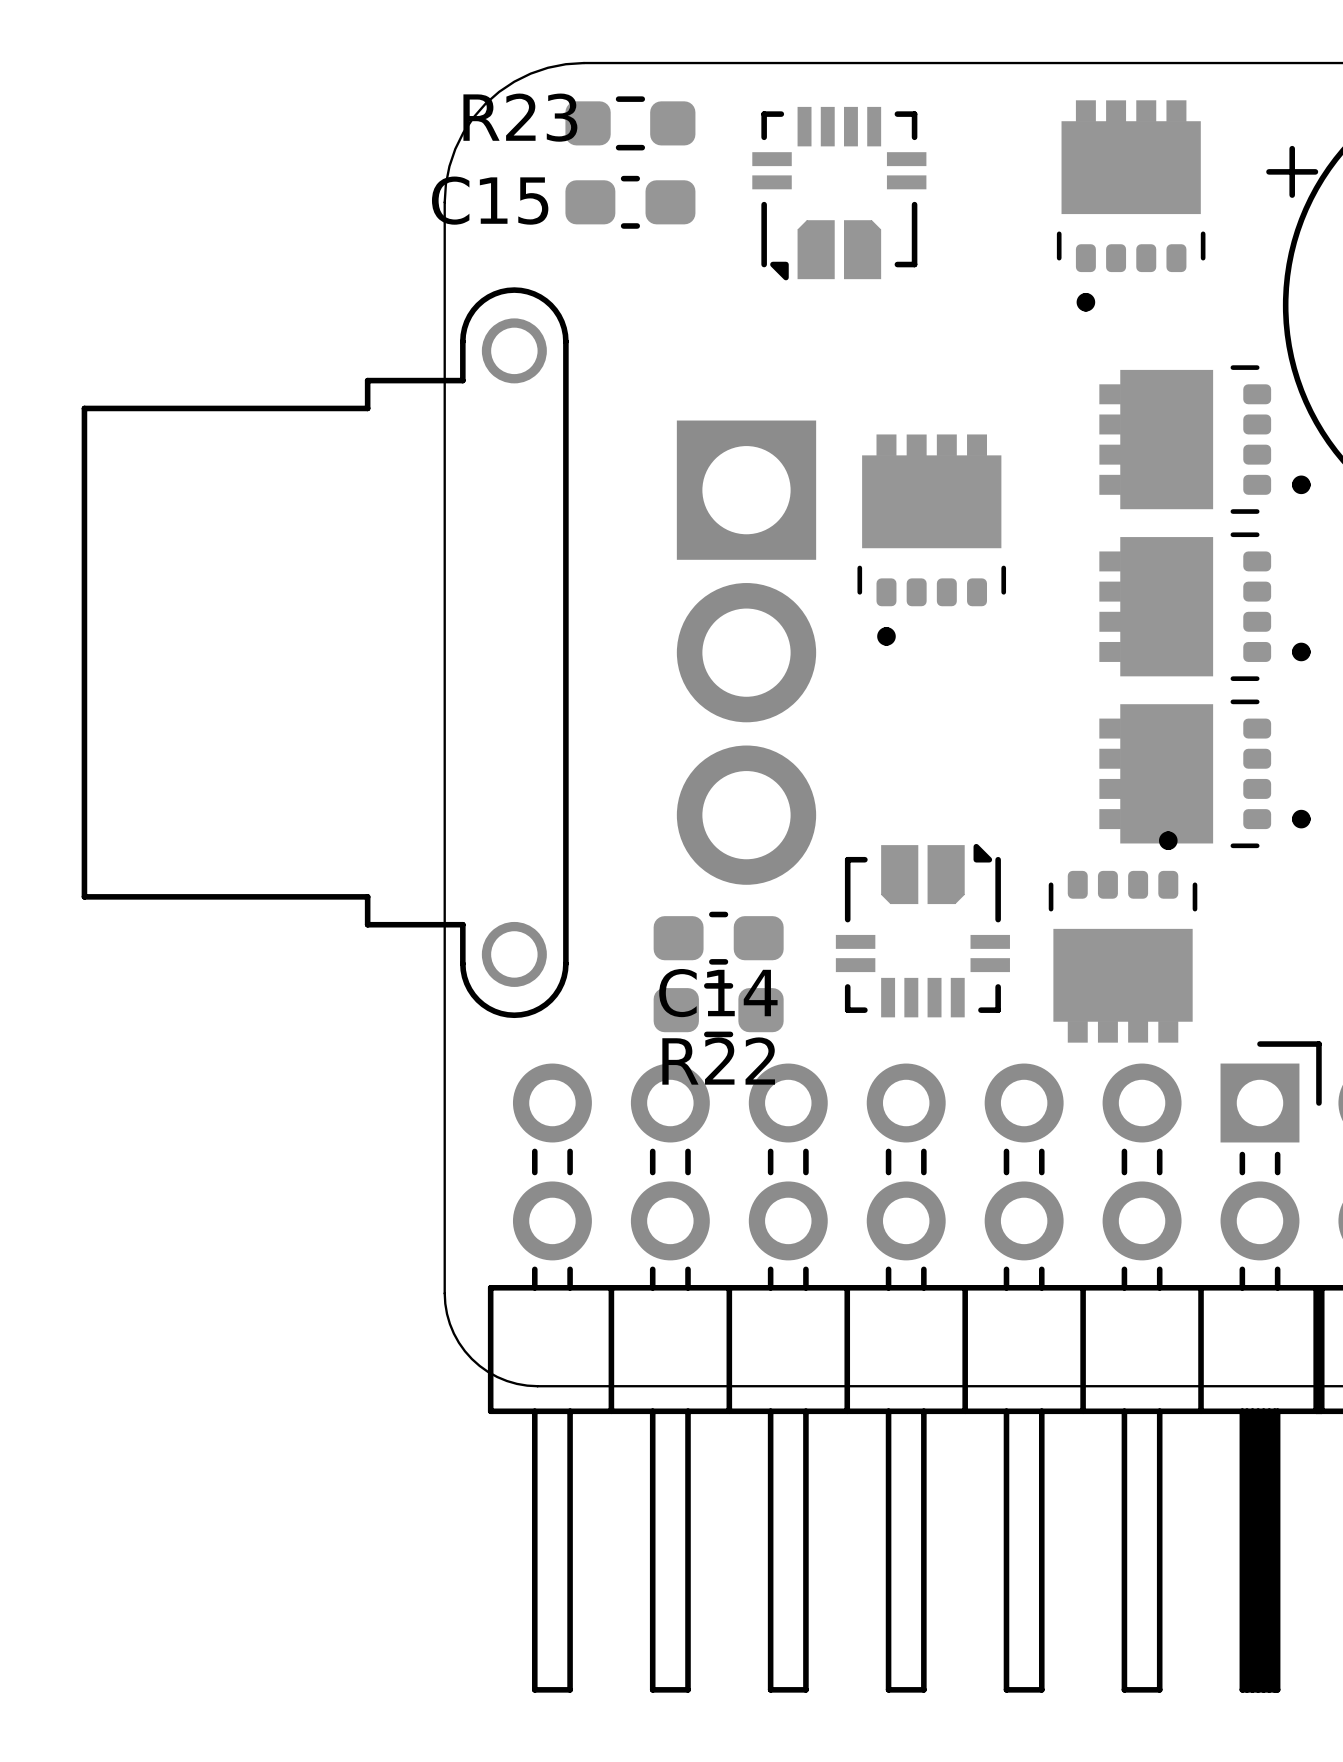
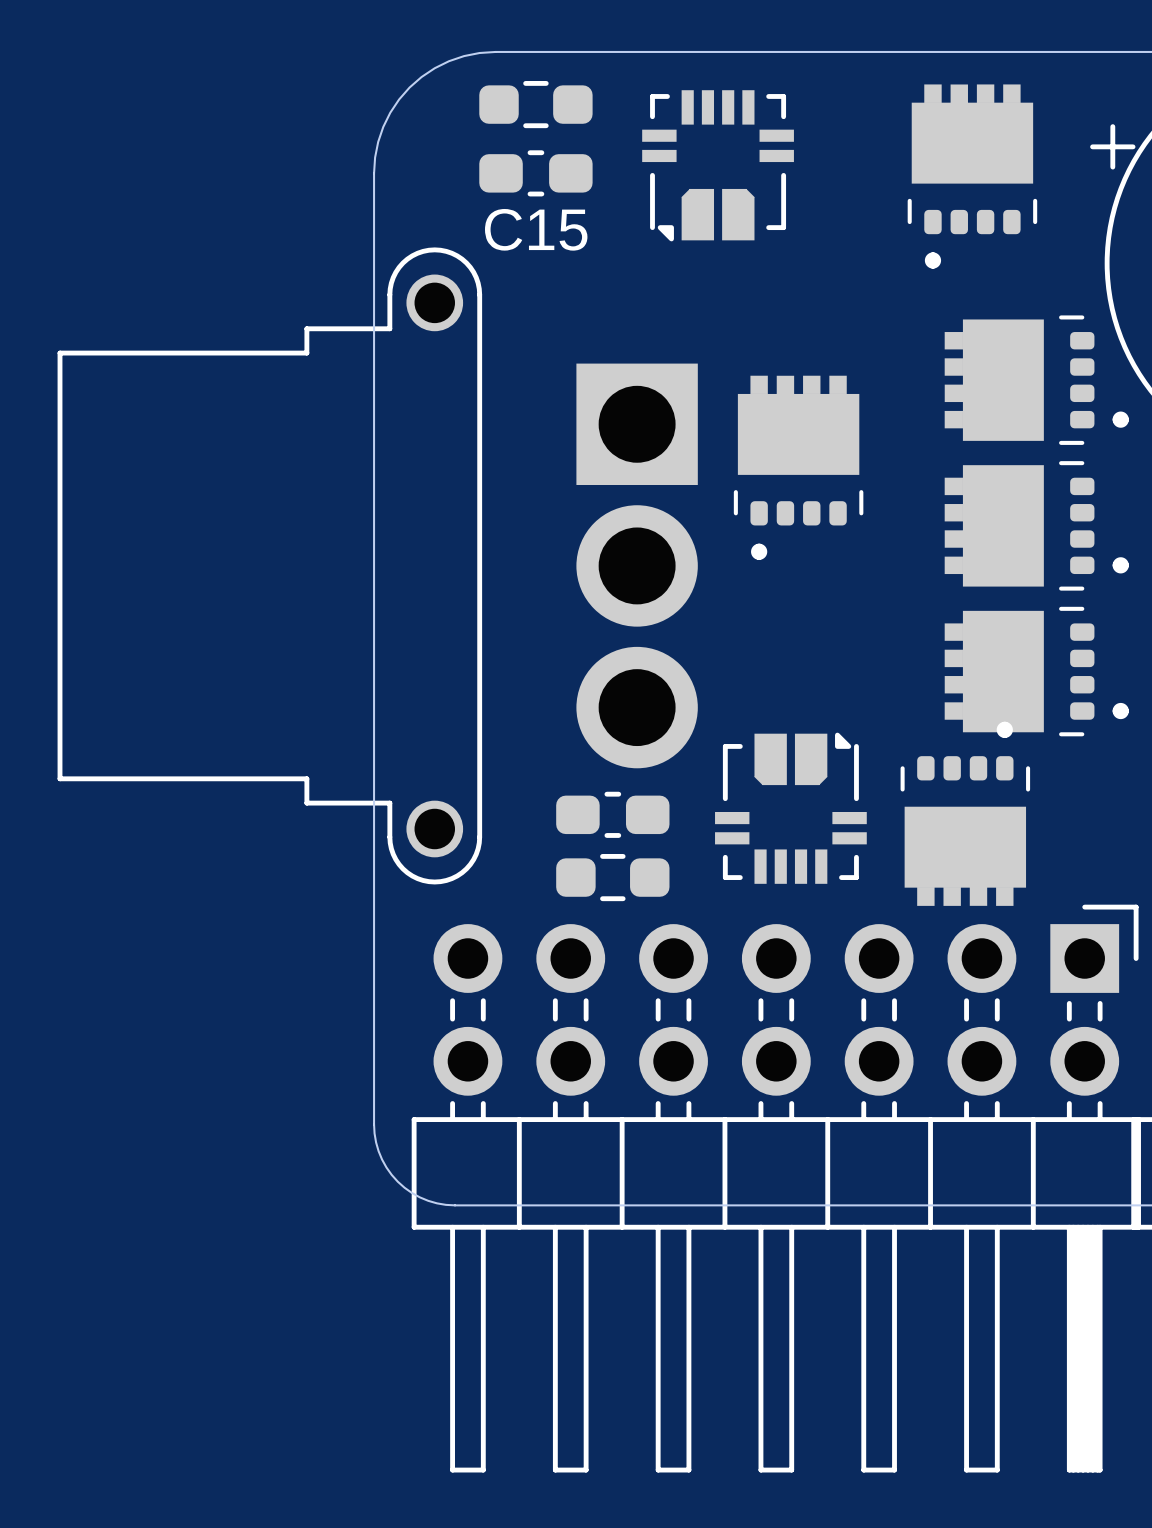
R23 name: R23 (520, 117) -> none
C15 name position: C15 (490, 200) -> C15 (536, 229)
C14 name: C14 (718, 993) -> none
R22 name: R22 (718, 1061) -> none

